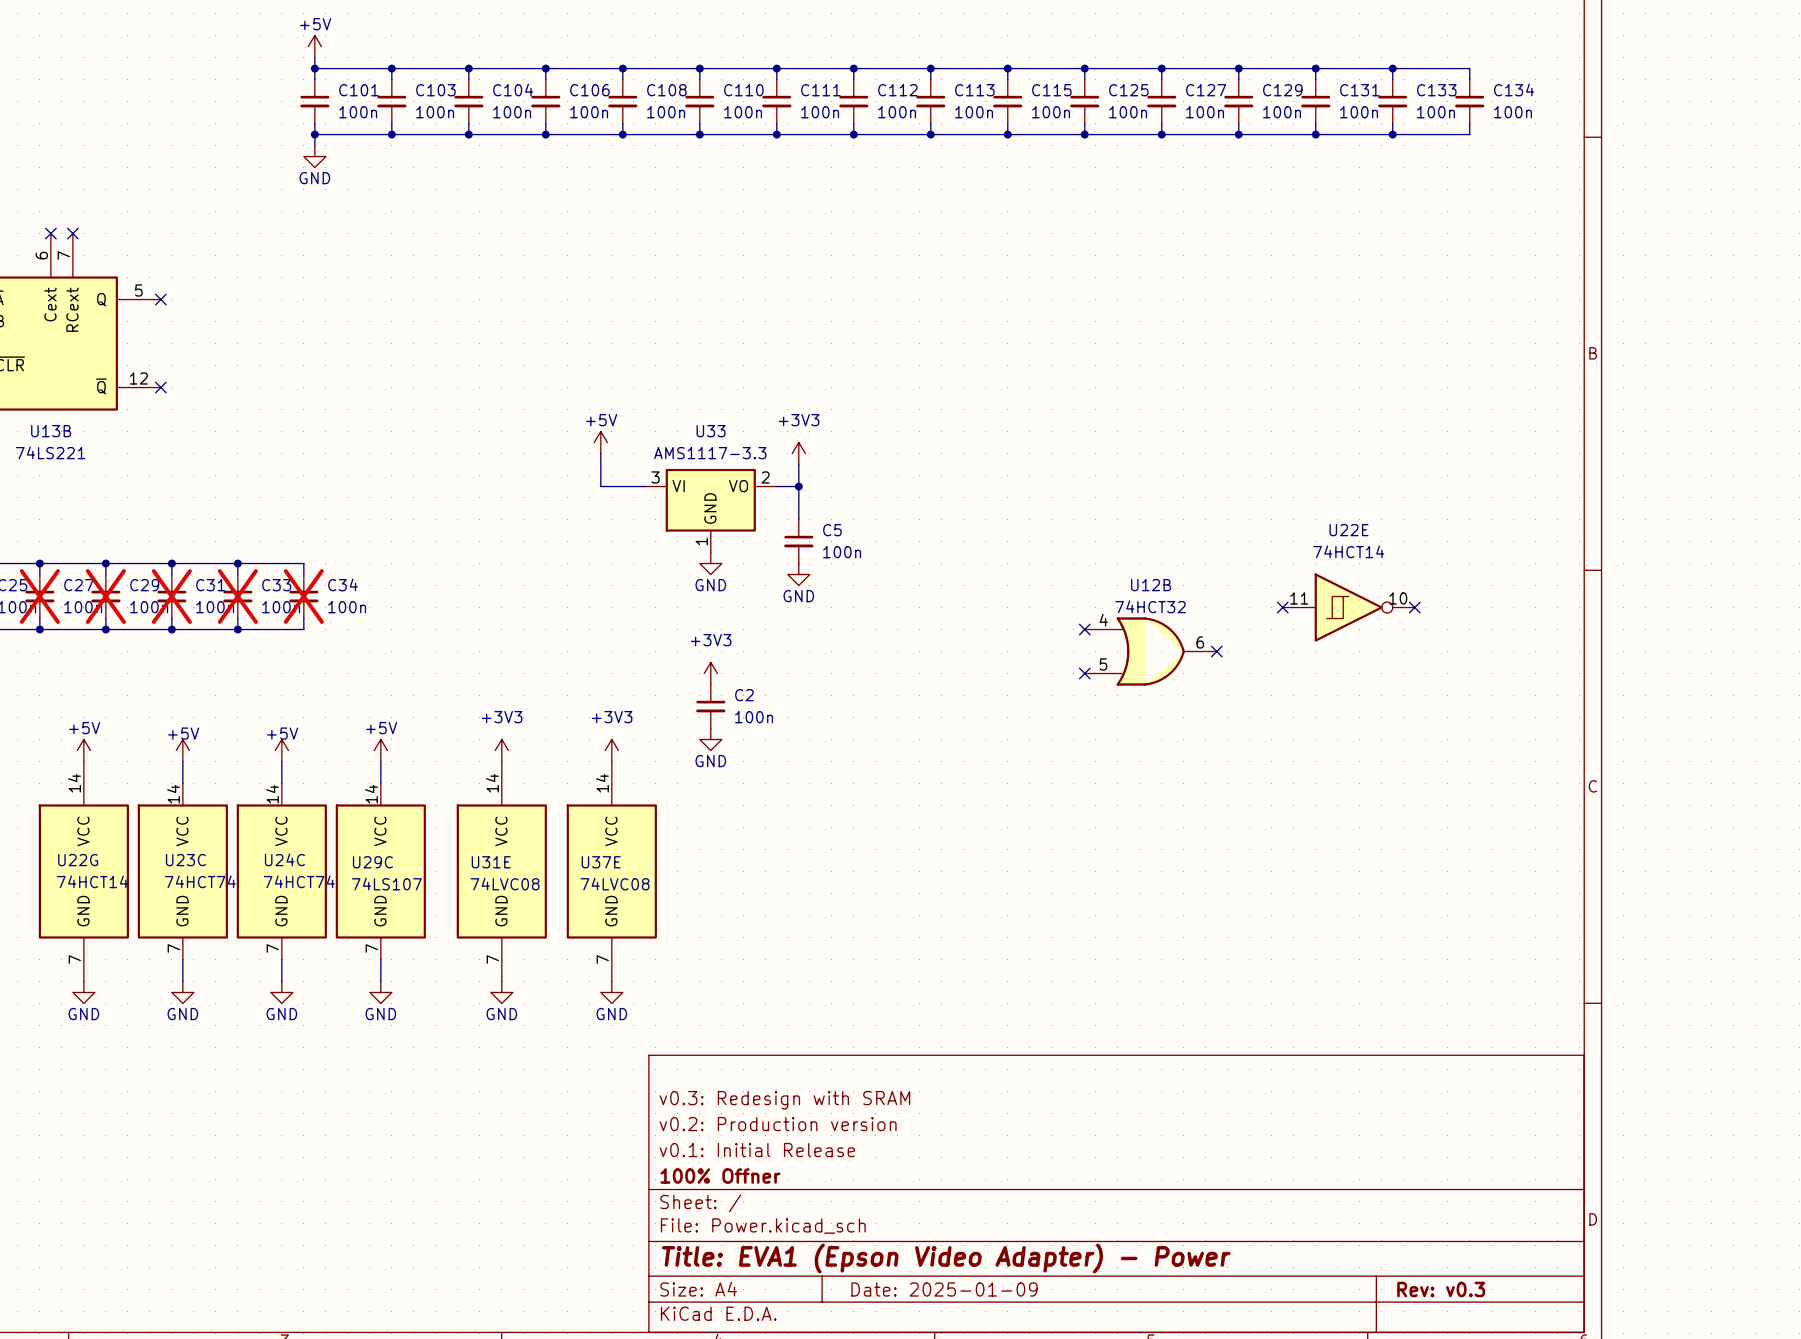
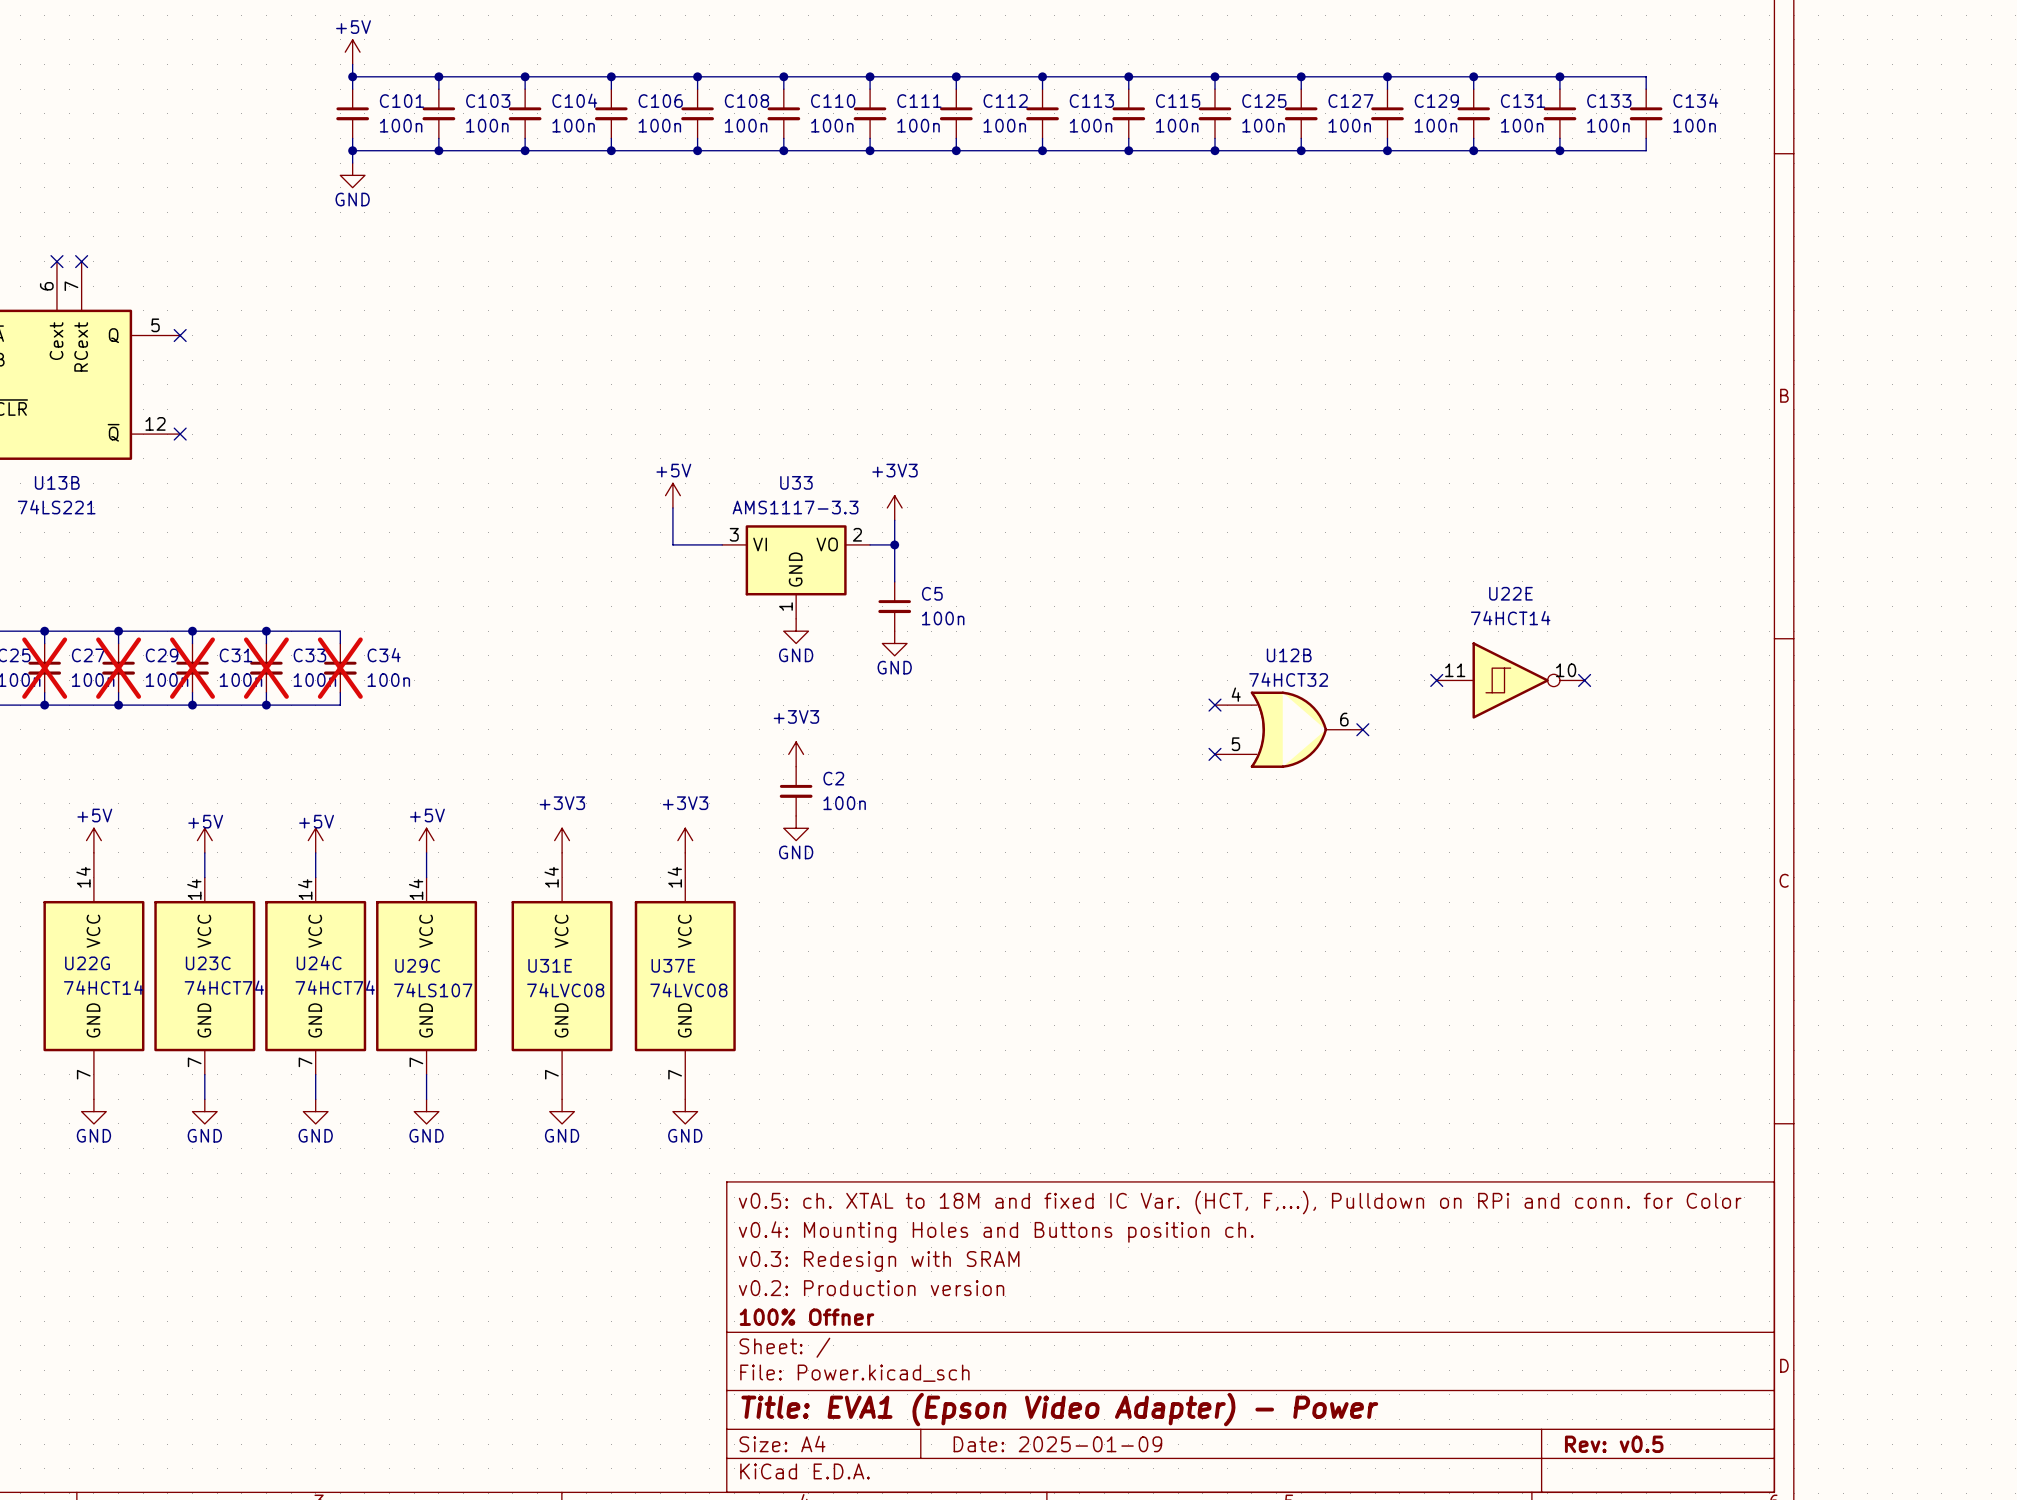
title block: none -> v0.5: ch. XTAL to 18M and fixed IC Var. (HCT, F,...), Pulldown on RPi and conn. for Color (1240, 1202)
title block: v0.3: Redesign with SRAM (784, 1100) -> v0.4: Mounting Holes and Buttons position ch. (996, 1231)
title block: v0.2: Production version (778, 1124) -> v0.3: Redesign with SRAM (879, 1261)
title block: v0.1: Initial Release (757, 1150) -> v0.2: Production version (871, 1288)
title block: Rev: v0.3 (1441, 1289) -> Rev: v0.5 (1614, 1444)

